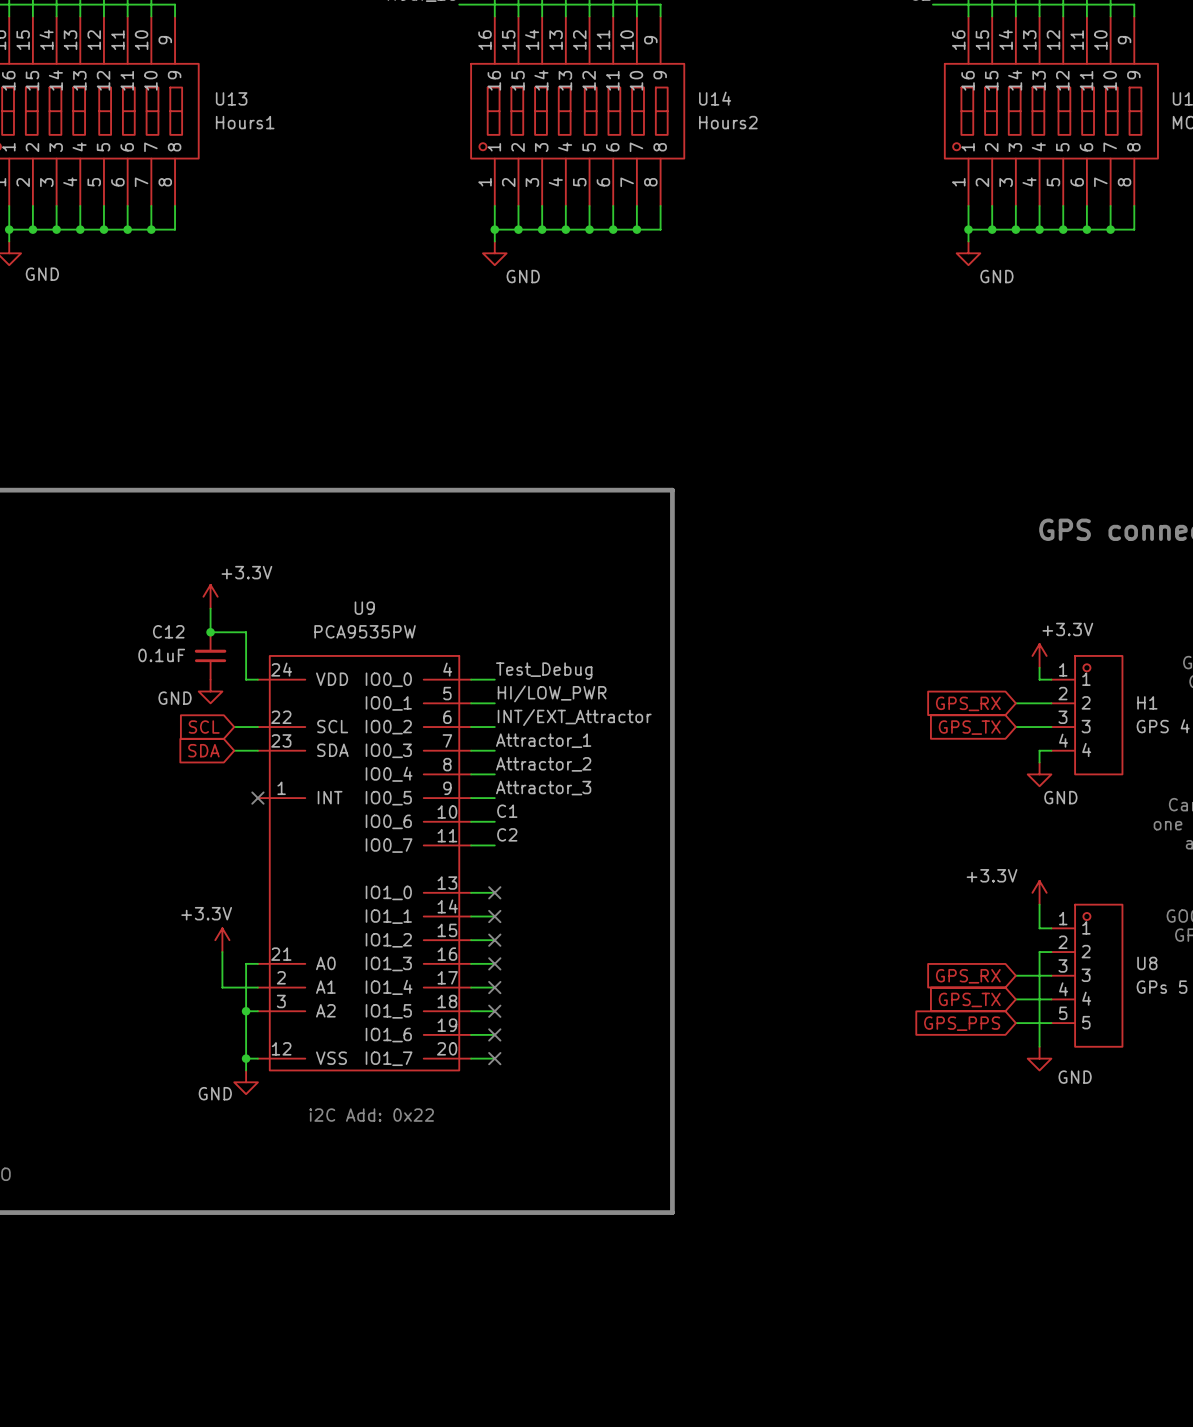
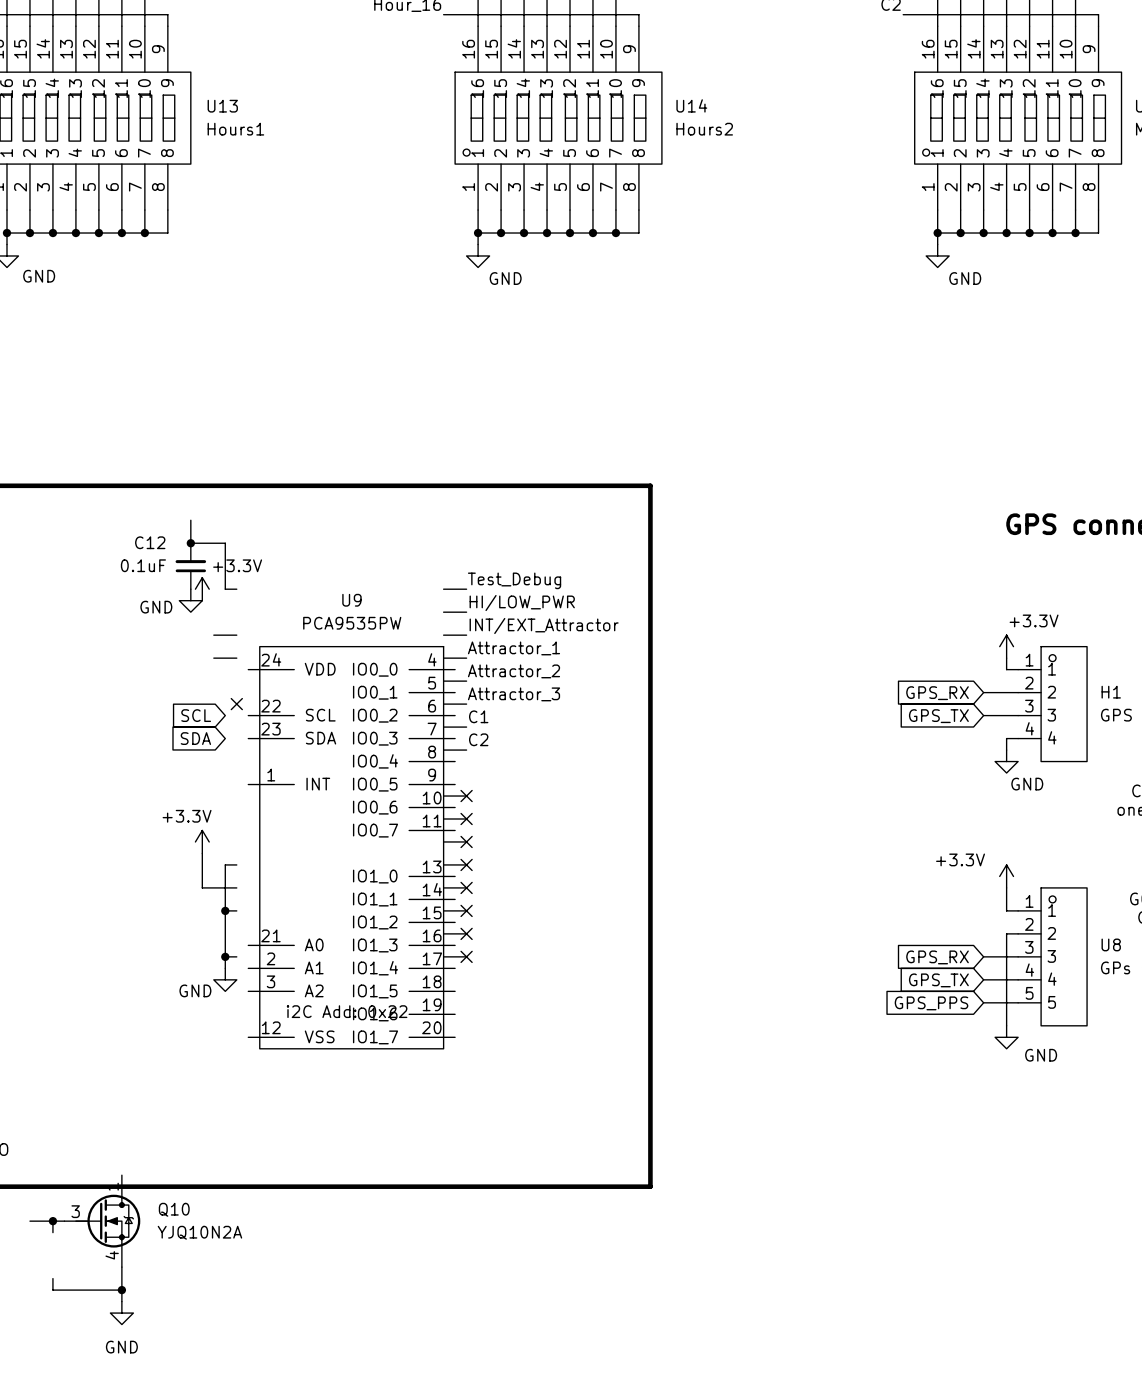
junction: none -> (190, 543)
wire: (210, 608) (210, 632) (246, 632) (246, 679) (257, 679) -> (190, 520) (190, 543) (225, 543) (225, 589) (236, 589)
junction: (210, 632) -> none
C12 position: (210, 655) -> (190, 566)
label position: Test_Debug (544, 671) -> Test_Debug (514, 580)
wire: (471, 679) (494, 679) -> (443, 589) (466, 589)
power symbol position: GND (210, 691) -> GND (190, 600)
label position: HI/LOW_PWR (552, 693) -> HI/LOW_PWR (522, 603)
wire: (471, 703) (494, 703) -> (443, 612) (466, 612)
no-connect mark: none -> (236, 704)
label position: INT/EXT_Attractor (574, 717) -> INT/EXT_Attractor (544, 626)
wire: (234, 727) (257, 727) -> (213, 635) (236, 635)
wire: (471, 727) (494, 727) -> (443, 635) (466, 635)
label position: Attractor_1 (543, 740) -> Attractor_1 (514, 648)
wire: (234, 750) (257, 750) -> (213, 658) (236, 658)
wire: (471, 750) (494, 750) -> (443, 658) (466, 658)
label position: Attractor_2 (543, 764) -> Attractor_2 (514, 671)
wire: (471, 774) (494, 774) -> (443, 681) (466, 681)
label position: Attractor_3 (543, 788) -> Attractor_3 (514, 694)
no-connect mark: (257, 798) -> none
wire: (471, 798) (494, 798) -> (443, 704) (466, 704)
no-connect mark: none -> (466, 796)
label position: C1 (507, 811) -> C1 (478, 716)
wire: (471, 821) (494, 821) -> (443, 727) (466, 727)
no-connect mark: none -> (466, 818)
label position: C2 (507, 834) -> C2 (478, 739)
wire: (471, 845) (494, 845) -> (443, 750) (466, 750)
no-connect mark: none -> (466, 841)
no-connect mark: none -> (466, 864)
wire: (471, 892) (494, 892) -> (443, 796) (466, 796)
no-connect mark: (494, 892) -> none
no-connect mark: none -> (466, 887)
wire: (471, 916) (494, 916) -> (443, 818) (466, 818)
no-connect mark: (494, 916) -> none
junction: none -> (225, 910)
no-connect mark: none -> (466, 910)
power symbol position: +3.3V (222, 940) -> +3.3V (202, 841)
wire: (471, 940) (494, 940) -> (443, 841) (466, 841)
no-connect mark: (494, 940) -> none
wire: (222, 952) (222, 987) (257, 987) -> (202, 853) (202, 887) (236, 887)
no-connect mark: none -> (466, 933)
wire: (257, 963) (246, 963) (246, 1070) -> (236, 864) (225, 864) (225, 968)
wire: (471, 963) (494, 963) -> (443, 864) (466, 864)
no-connect mark: (494, 963) -> none
no-connect mark: none -> (466, 956)
wire: (471, 987) (494, 987) -> (443, 887) (466, 887)
no-connect mark: (494, 987) -> none
wire: (246, 1011) (257, 1011) -> (225, 910) (236, 910)
junction position: (246, 1011) -> (225, 956)
wire: (471, 1011) (494, 1011) -> (443, 910) (466, 910)
no-connect mark: (494, 1011) -> none
wire: (471, 1034) (494, 1034) -> (443, 933) (466, 933)
no-connect mark: (494, 1034) -> none
wire: (246, 1058) (257, 1058) -> (225, 956) (236, 956)
junction: (246, 1058) -> none
wire: (471, 1058) (494, 1058) -> (443, 956) (466, 956)
no-connect mark: (494, 1058) -> none
power symbol position: GND (246, 1082) -> GND (225, 979)
text position: i2C Add: 0x22 (371, 1115) -> i2C Add: 0x22 (347, 1011)
wire: none -> (29, 1221) (64, 1221)
wire: none -> (52, 1221) (52, 1232)
junction: none -> (52, 1221)
Q10: none -> YJQ10N2A (102, 1221)
wire: none -> (121, 1267) (121, 1301)
wire: none -> (52, 1278) (52, 1290) (121, 1290)
junction: none -> (121, 1290)
power symbol: none -> GND (121, 1313)

